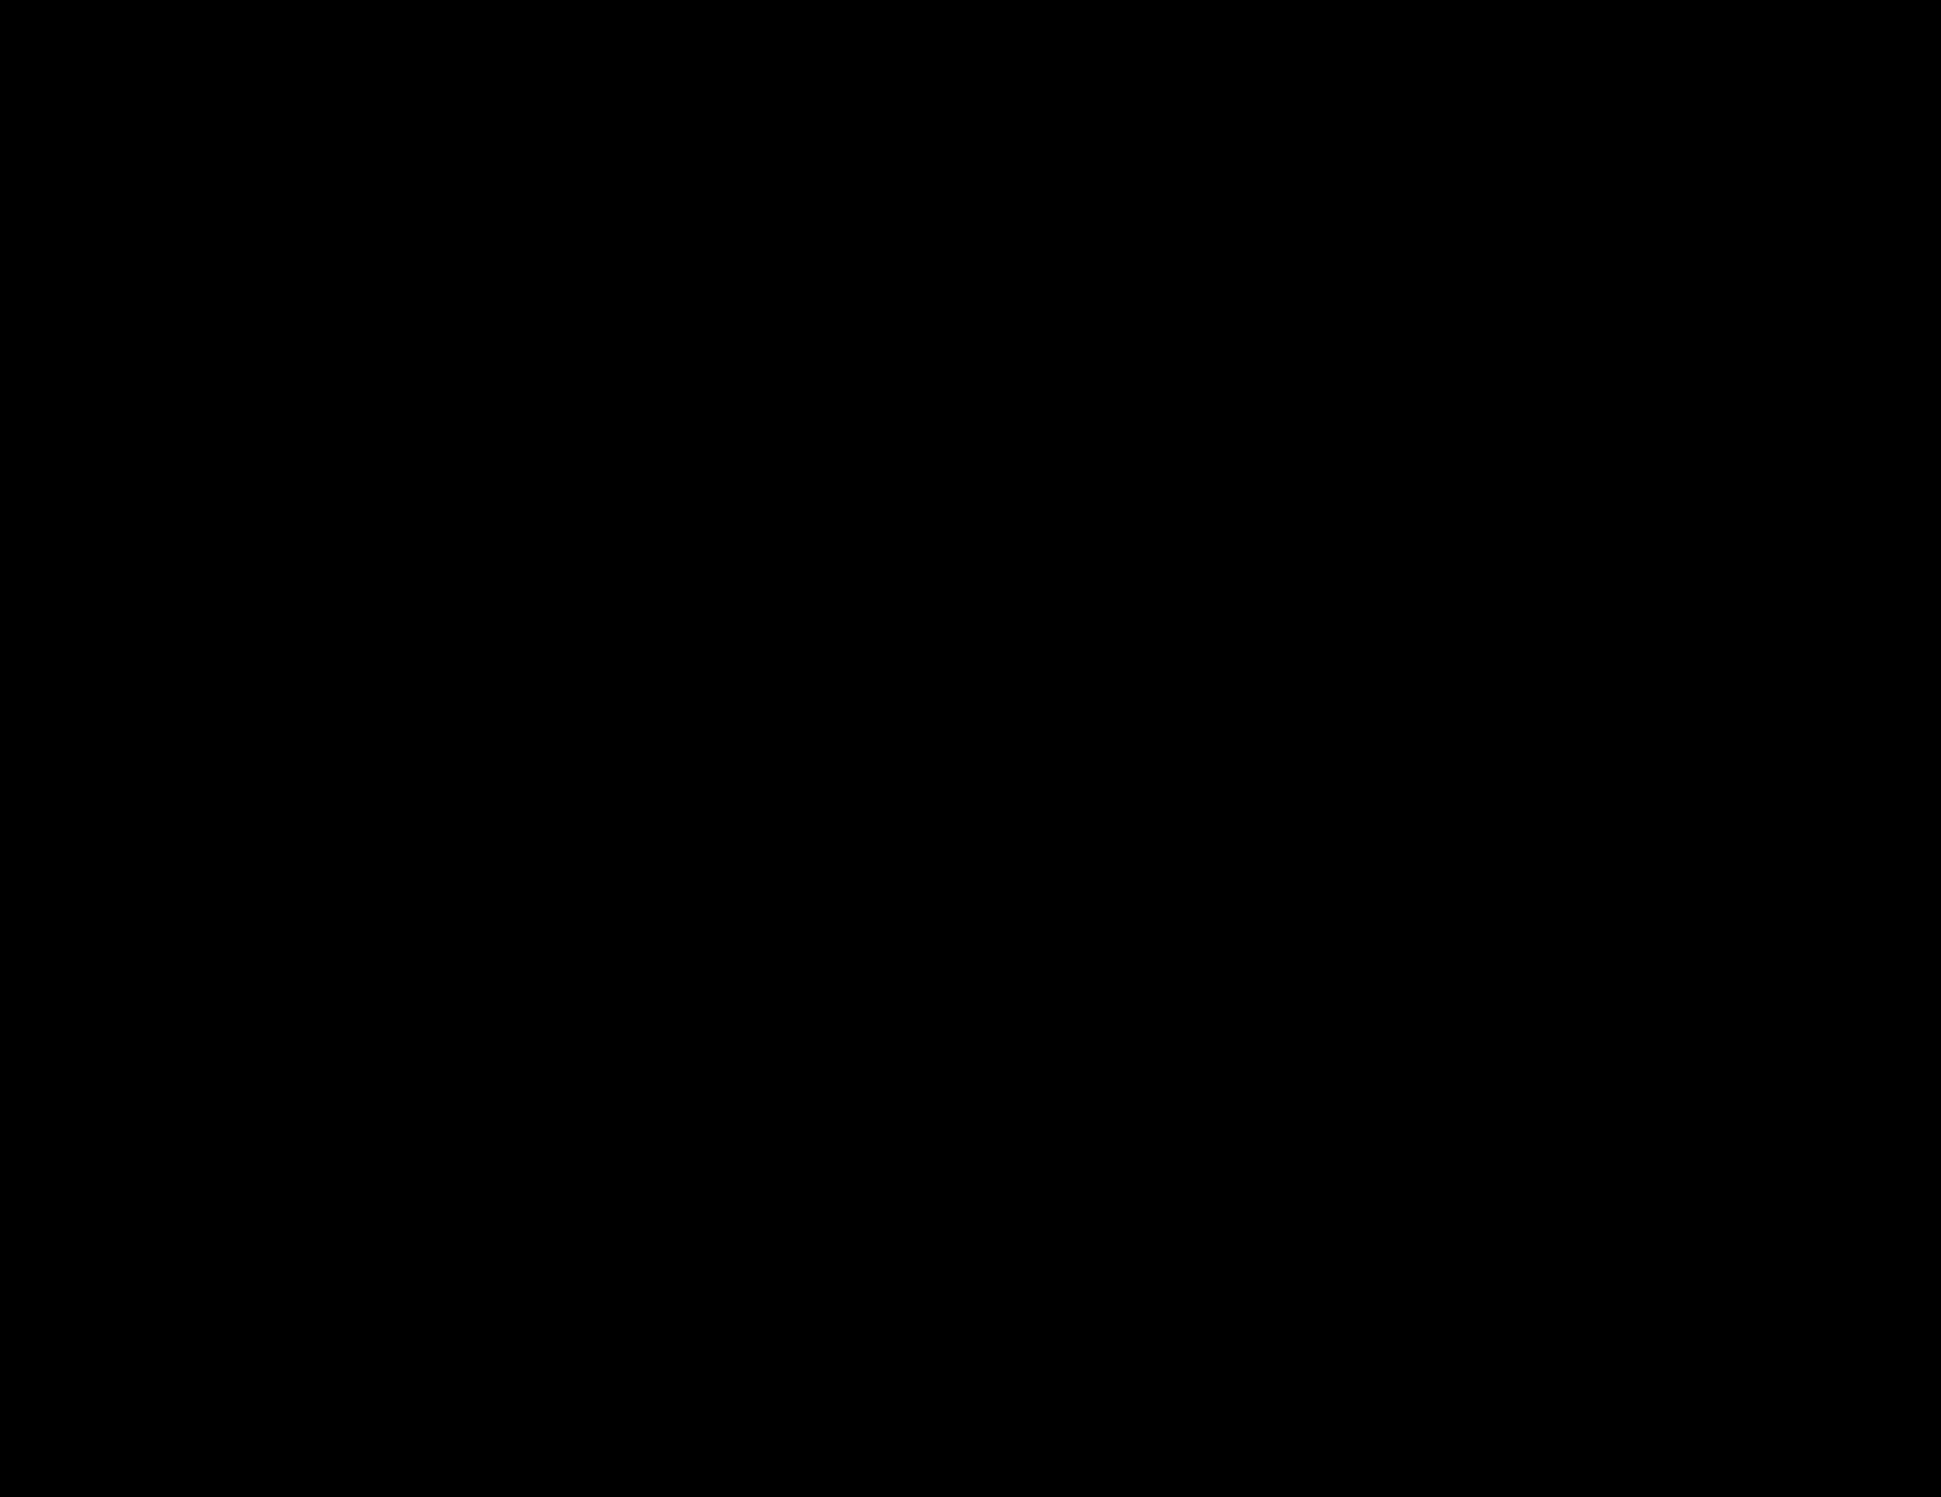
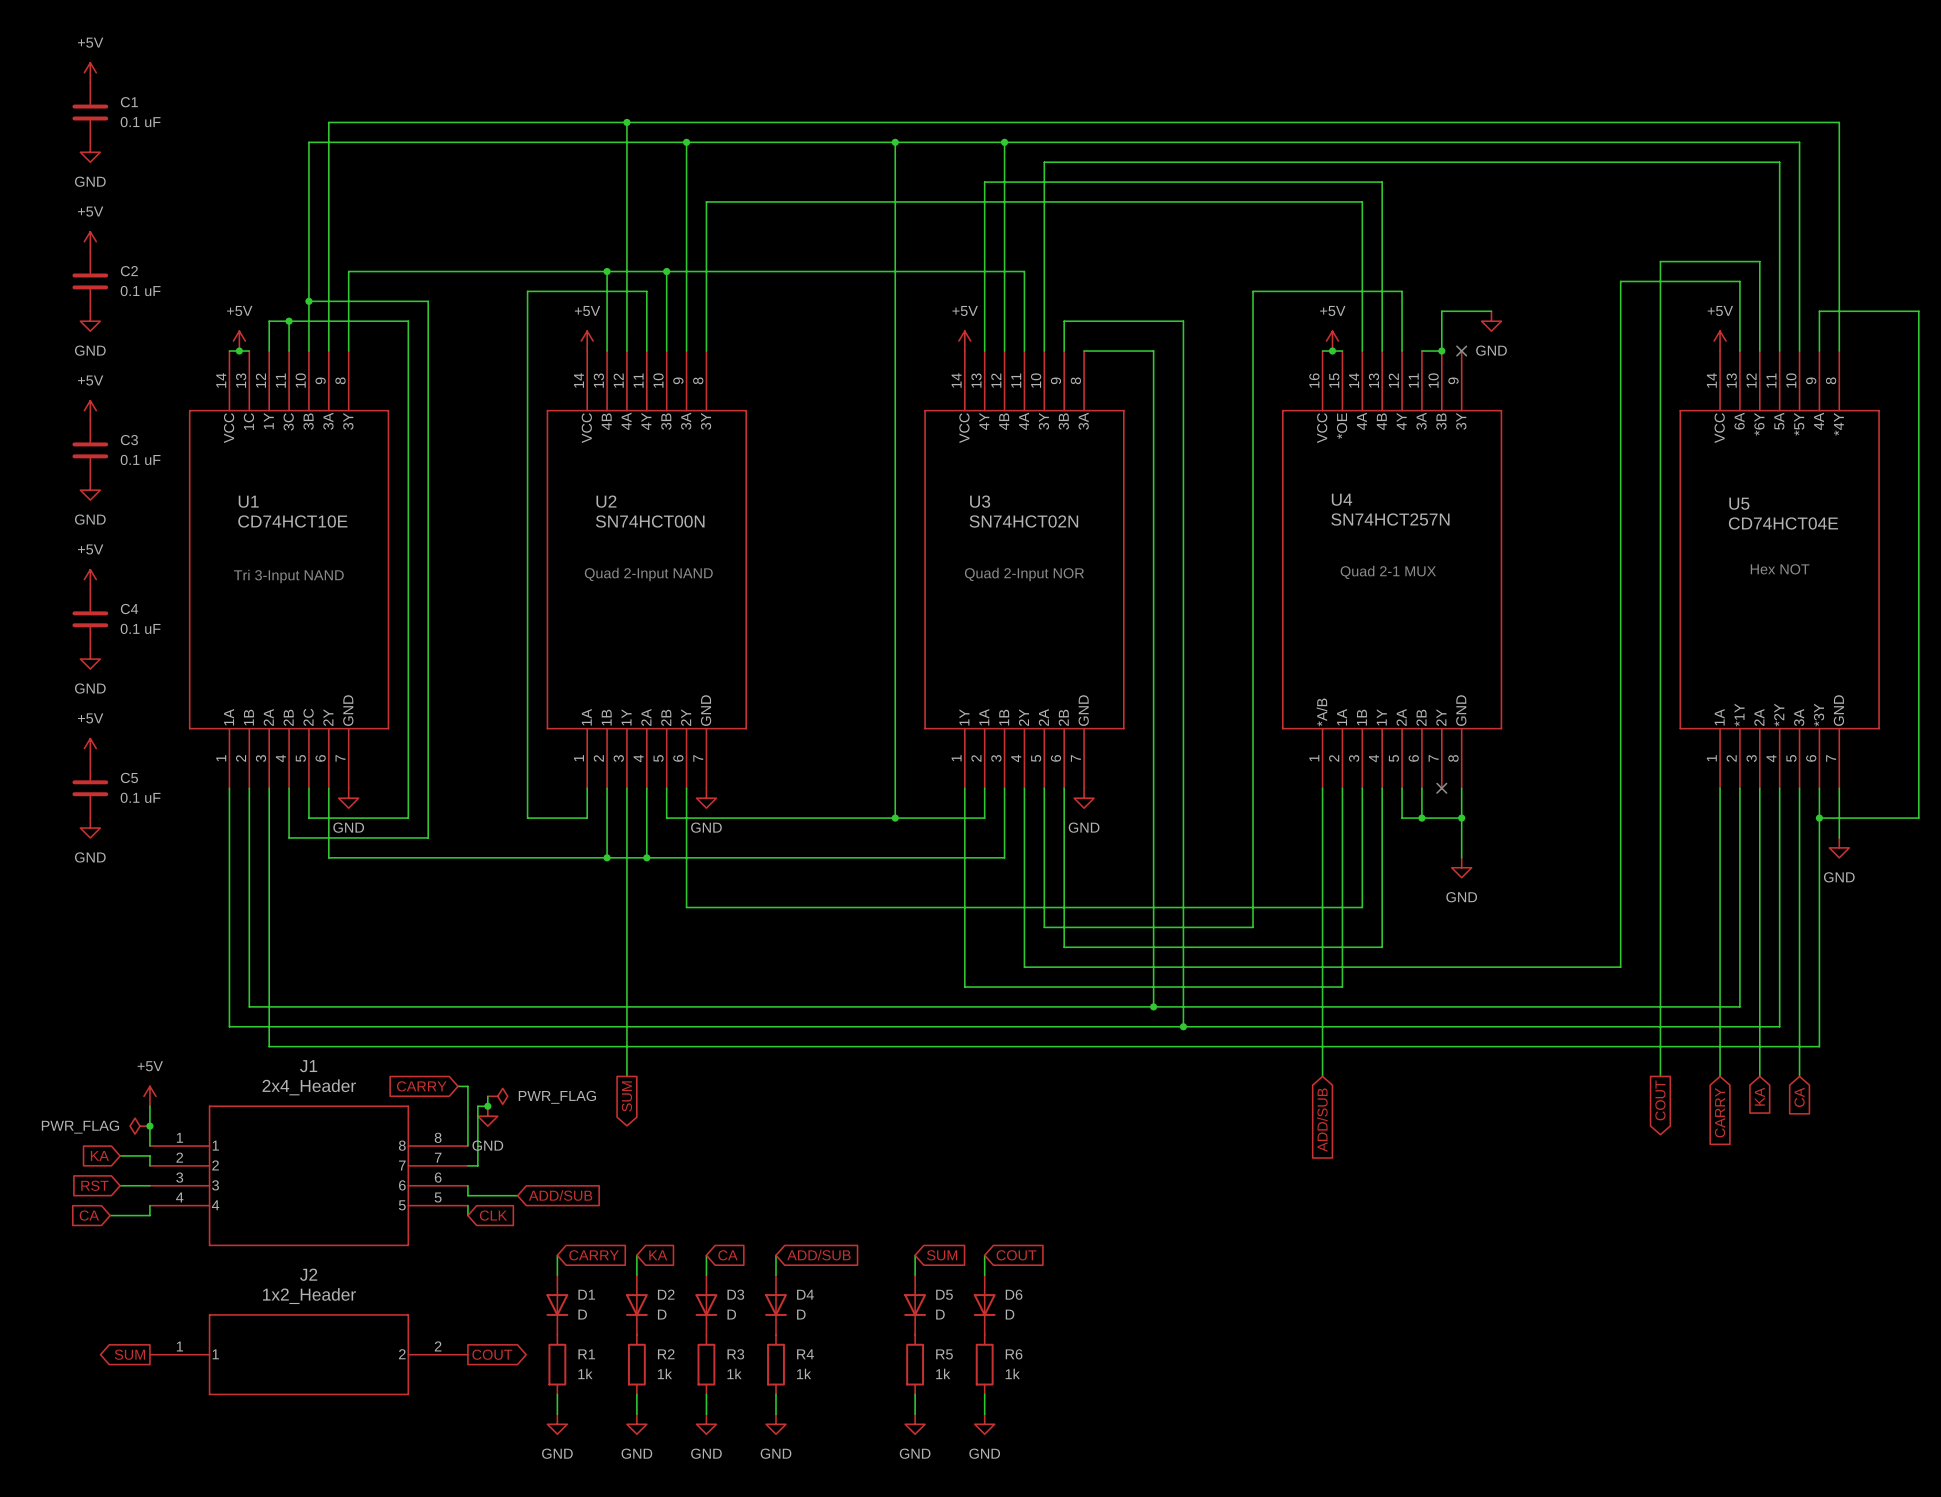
power symbol: none -> +5V (90, 72)
C1: none -> 0.1 uF (90, 112)
wire: none -> (626, 122) (626, 351)
junction: none -> (626, 122)
wire: none -> (686, 142) (686, 351)
junction: none -> (686, 142)
wire: none -> (895, 142) (895, 818)
junction: none -> (895, 142)
wire: none -> (1004, 142) (1004, 351)
junction: none -> (1004, 142)
power symbol: none -> GND (90, 152)
power symbol: none -> +5V (90, 241)
wire: none -> (607, 271) (607, 351)
junction: none -> (607, 271)
wire: none -> (666, 271) (666, 351)
junction: none -> (666, 271)
C2: none -> 0.1 uF (90, 281)
wire: none -> (308, 301) (428, 301) (428, 837) (289, 837) (289, 788)
junction: none -> (308, 301)
wire: none -> (1491, 311) (1441, 311) (1441, 351) (1421, 351)
power symbol: none -> GND (90, 321)
wire: none -> (289, 321) (289, 351)
junction: none -> (289, 321)
power symbol: none -> GND (1491, 321)
power symbol: none -> +5V (239, 341)
power symbol: none -> +5V (587, 341)
power symbol: none -> +5V (964, 341)
power symbol: none -> +5V (1332, 341)
power symbol: none -> +5V (1720, 341)
wire: none -> (229, 351) (249, 351)
junction: none -> (239, 351)
wire: none -> (269, 351) (269, 321) (408, 321) (408, 818) (308, 818) (308, 788)
wire: none -> (308, 351) (308, 142) (1799, 142) (1799, 351)
wire: none -> (328, 351) (328, 122) (1839, 122) (1839, 351)
wire: none -> (348, 351) (348, 271) (1024, 271) (1024, 351)
wire: none -> (646, 351) (646, 291) (527, 291) (527, 818) (587, 818) (587, 788)
wire: none -> (706, 351) (706, 201) (1362, 201) (1362, 351)
wire: none -> (984, 351) (984, 182) (1382, 182) (1382, 351)
wire: none -> (1044, 351) (1044, 162) (1779, 162) (1779, 351)
wire: none -> (1064, 351) (1064, 321) (1183, 321) (1183, 1026)
wire: none -> (1084, 351) (1153, 351) (1153, 1006)
wire: none -> (1322, 351) (1342, 351)
junction: none -> (1332, 351)
wire: none -> (1402, 351) (1402, 291) (1252, 291) (1252, 927) (1044, 927) (1044, 788)
junction: none -> (1441, 351)
no-connect mark: none -> (1461, 351)
wire: none -> (1739, 351) (1739, 281) (1620, 281) (1620, 967) (1024, 967) (1024, 788)
wire: none -> (1759, 351) (1759, 261) (1660, 261) (1660, 1076)
wire: none -> (1819, 351) (1819, 311) (1918, 311) (1918, 818) (1819, 818)
power symbol: none -> +5V (90, 410)
C3: none -> 0.1 uF (90, 450)
power symbol: none -> GND (90, 490)
U1: none -> CD74HCT10E (289, 569)
U2: none -> SN74HCT00N (646, 569)
U3: none -> SN74HCT02N (1024, 569)
U4: none -> SN74HCT257N (1392, 569)
U5: none -> CD74HCT04E (1779, 569)
text: none -> Hex NOT (1780, 569)
text: none -> Quad 2-1 MUX (1388, 572)
text: none -> Quad 2-Input NAND (648, 574)
text: none -> Quad 2-Input NOR (1024, 574)
text: none -> Tri 3-Input NAND (288, 576)
power symbol: none -> +5V (90, 579)
C4: none -> 0.1 uF (90, 619)
power symbol: none -> GND (90, 659)
power symbol: none -> +5V (90, 748)
C5: none -> 0.1 uF (90, 788)
wire: none -> (229, 788) (229, 1026) (1779, 1026) (1779, 788)
wire: none -> (249, 788) (249, 1006) (1739, 1006) (1739, 788)
wire: none -> (269, 788) (269, 1046) (1819, 1046) (1819, 788)
wire: none -> (328, 788) (328, 857) (1004, 857) (1004, 788)
wire: none -> (607, 788) (607, 857)
wire: none -> (626, 788) (626, 1076)
wire: none -> (646, 788) (646, 857)
wire: none -> (666, 788) (666, 818) (984, 818) (984, 788)
wire: none -> (686, 788) (686, 907) (1362, 907) (1362, 788)
wire: none -> (964, 788) (964, 987) (1342, 987) (1342, 788)
wire: none -> (1064, 788) (1064, 947) (1382, 947) (1382, 788)
wire: none -> (1322, 788) (1322, 1076)
wire: none -> (1402, 788) (1402, 818) (1461, 818)
wire: none -> (1421, 788) (1421, 818)
no-connect mark: none -> (1441, 788)
wire: none -> (1461, 788) (1461, 857)
wire: none -> (1720, 788) (1720, 1076)
wire: none -> (1759, 788) (1759, 1076)
wire: none -> (1799, 788) (1799, 1076)
wire: none -> (1839, 788) (1839, 837)
power symbol: none -> GND (348, 798)
power symbol: none -> GND (706, 798)
power symbol: none -> GND (1084, 798)
junction: none -> (895, 818)
junction: none -> (1421, 818)
junction: none -> (1461, 818)
junction: none -> (1819, 818)
power symbol: none -> GND (90, 828)
power symbol: none -> GND (1839, 847)
junction: none -> (607, 857)
junction: none -> (646, 857)
power symbol: none -> GND (1461, 867)
junction: none -> (1153, 1006)
junction: none -> (1183, 1026)
global label: none -> CARRY (421, 1086)
wire: none -> (458, 1086) (467, 1086) (467, 1146)
global label: none -> SUM (626, 1096)
power symbol: none -> +5V (149, 1096)
wire: none -> (487, 1096) (487, 1106) (477, 1106) (477, 1165) (467, 1165)
power symbol: none -> PWR_FLAG (497, 1096)
global label: none -> KA (1759, 1096)
global label: none -> CA (1799, 1097)
global label: none -> COUT (1660, 1100)
wire: none -> (149, 1106) (149, 1146)
junction: none -> (487, 1106)
global label: none -> CARRY (1720, 1112)
power symbol: none -> GND (487, 1116)
global label: none -> ADD/SUB (1322, 1120)
power symbol: none -> PWR_FLAG (140, 1126)
junction: none -> (149, 1126)
global label: none -> KA (99, 1155)
wire: none -> (120, 1155) (149, 1155) (149, 1165)
J1: none -> 2x4_Header (308, 1175)
global label: none -> RST (94, 1185)
wire: none -> (120, 1185) (149, 1185)
wire: none -> (467, 1185) (467, 1195) (517, 1195)
global label: none -> ADD/SUB (560, 1195)
wire: none -> (149, 1205) (149, 1215) (110, 1215)
wire: none -> (467, 1205) (467, 1215)
global label: none -> CA (89, 1215)
global label: none -> CLK (493, 1215)
wire: none -> (557, 1255) (557, 1275)
global label: none -> CARRY (594, 1255)
wire: none -> (636, 1255) (636, 1275)
global label: none -> KA (658, 1255)
wire: none -> (706, 1255) (706, 1275)
global label: none -> CA (728, 1255)
wire: none -> (776, 1255) (776, 1275)
global label: none -> ADD/SUB (818, 1255)
wire: none -> (915, 1255) (915, 1275)
global label: none -> SUM (942, 1255)
wire: none -> (984, 1255) (984, 1275)
global label: none -> COUT (1016, 1255)
D1: none -> D (557, 1305)
D2: none -> D (636, 1305)
D3: none -> D (706, 1305)
D4: none -> D (776, 1305)
D5: none -> D (915, 1305)
D6: none -> D (984, 1305)
global label: none -> SUM (129, 1354)
J2: none -> 1x2_Header (308, 1354)
global label: none -> COUT (492, 1354)
R1: none -> 1k (557, 1364)
R2: none -> 1k (636, 1364)
R3: none -> 1k (706, 1364)
R4: none -> 1k (776, 1364)
R5: none -> 1k (915, 1364)
R6: none -> 1k (984, 1364)
wire: none -> (557, 1394) (557, 1414)
wire: none -> (636, 1394) (636, 1414)
wire: none -> (706, 1394) (706, 1414)
wire: none -> (776, 1394) (776, 1414)
wire: none -> (915, 1394) (915, 1414)
wire: none -> (984, 1394) (984, 1414)
power symbol: none -> GND (557, 1424)
power symbol: none -> GND (636, 1424)
power symbol: none -> GND (706, 1424)
power symbol: none -> GND (776, 1424)
power symbol: none -> GND (915, 1424)
power symbol: none -> GND (984, 1424)

